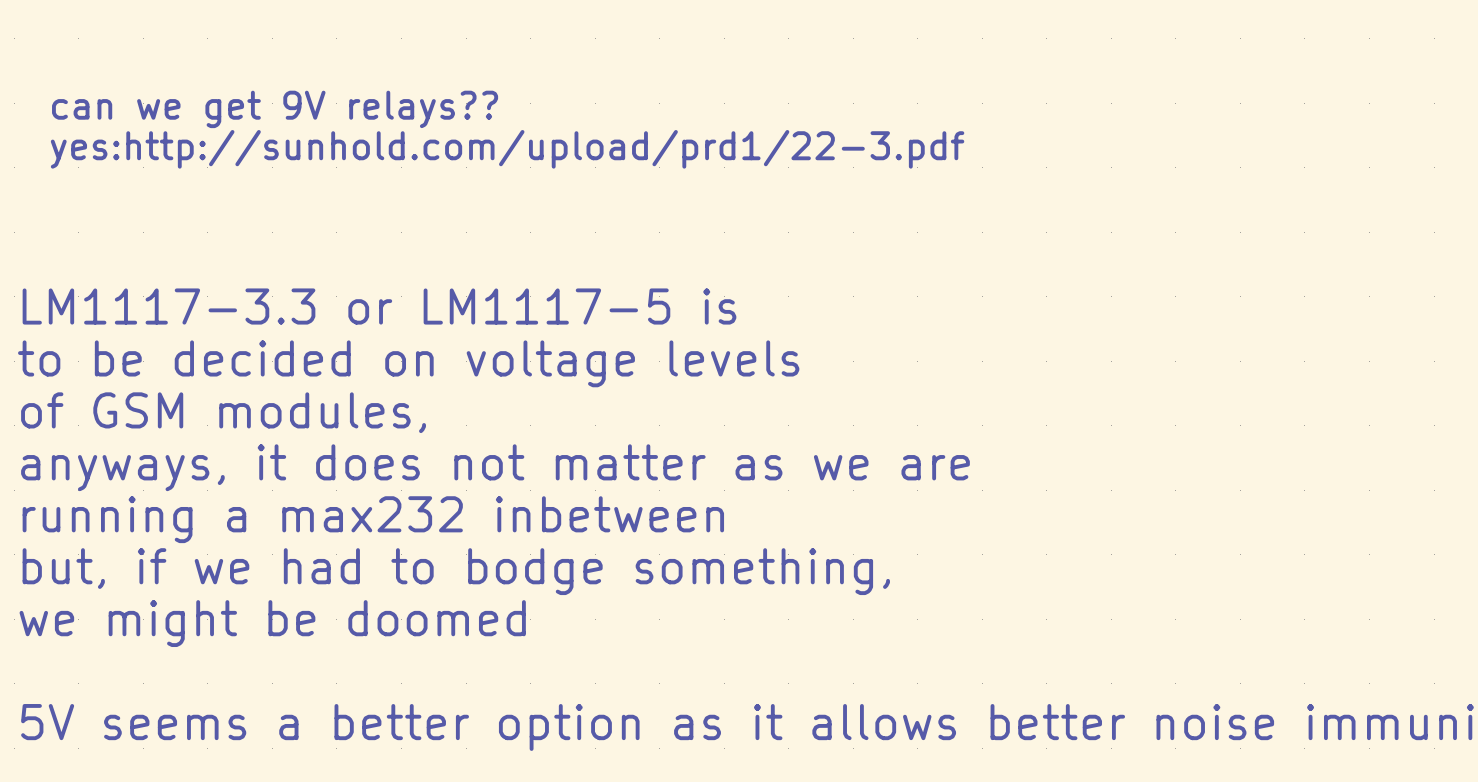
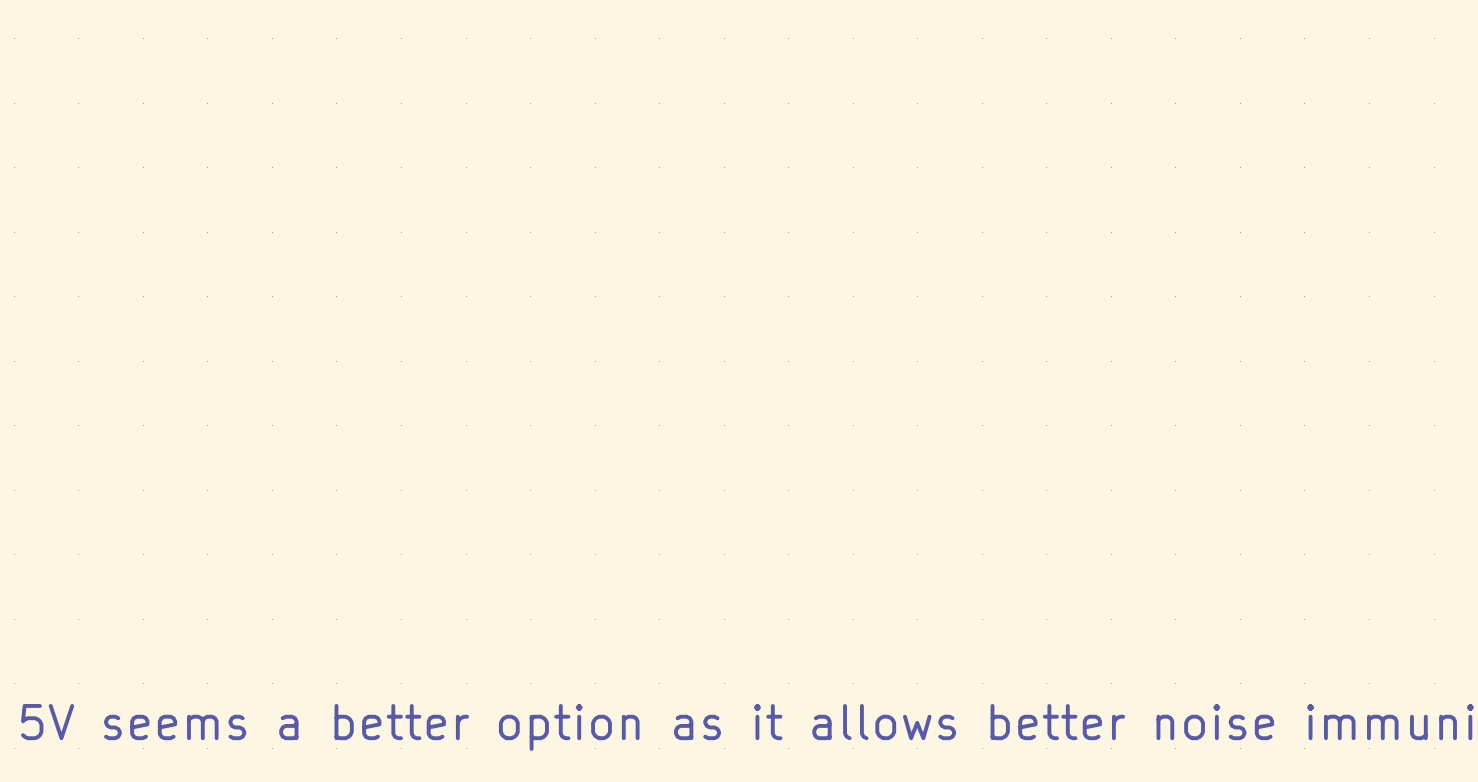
text: can we get 9V relays?? (275, 109) -> none
text: yes:http://sunhold.com/upload/prd1/22-3.pdf (507, 149) -> none
text: LM1117-3.3 or LM1117-5 is (379, 306) -> none
text: to be decided on voltage levels (408, 363) -> none
text: of GSM modules, (223, 412) -> none
text: anyways, it does not matter as we are (495, 467) -> none
text: running a max232 inbetween (373, 519) -> none
text: but, if we had to bodge something, (456, 571) -> none
text: we might be doomed (272, 623) -> none

